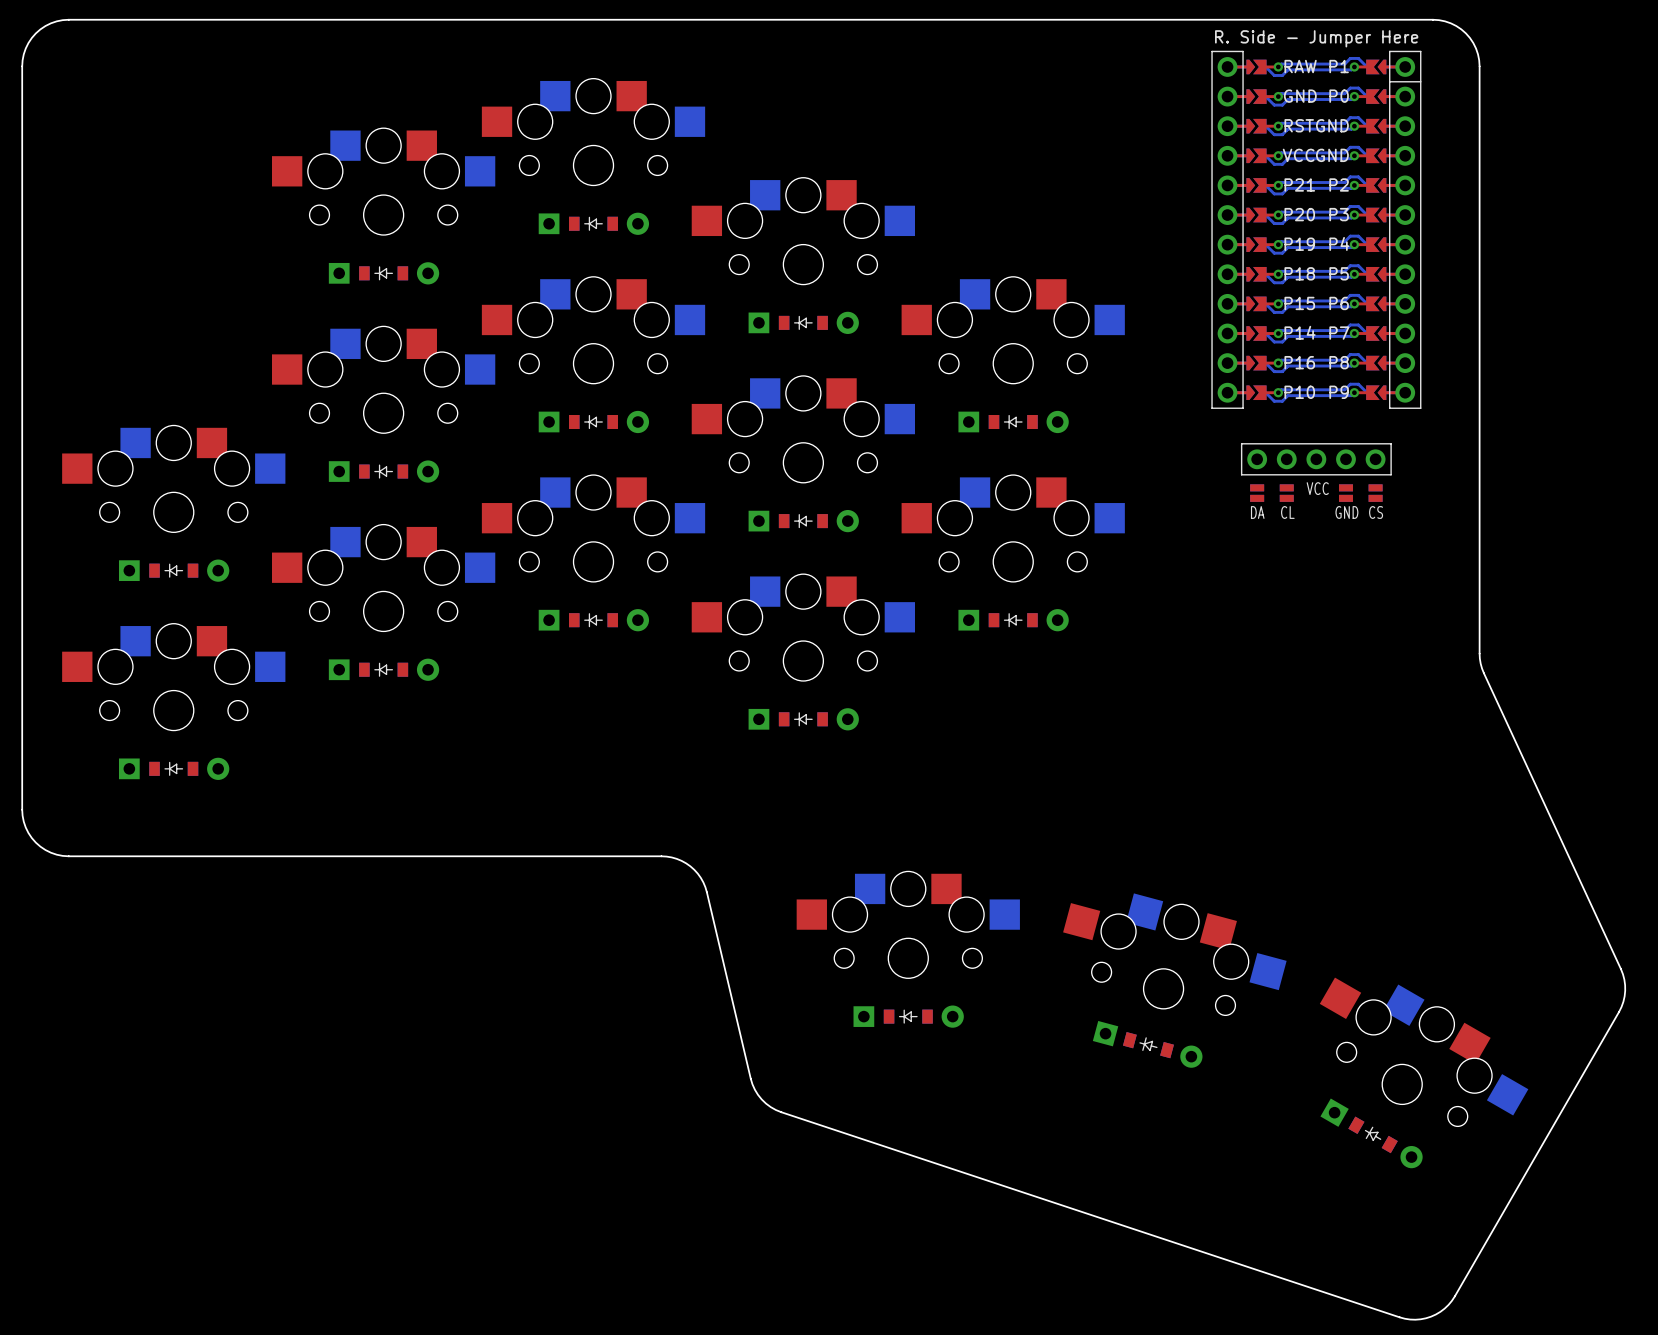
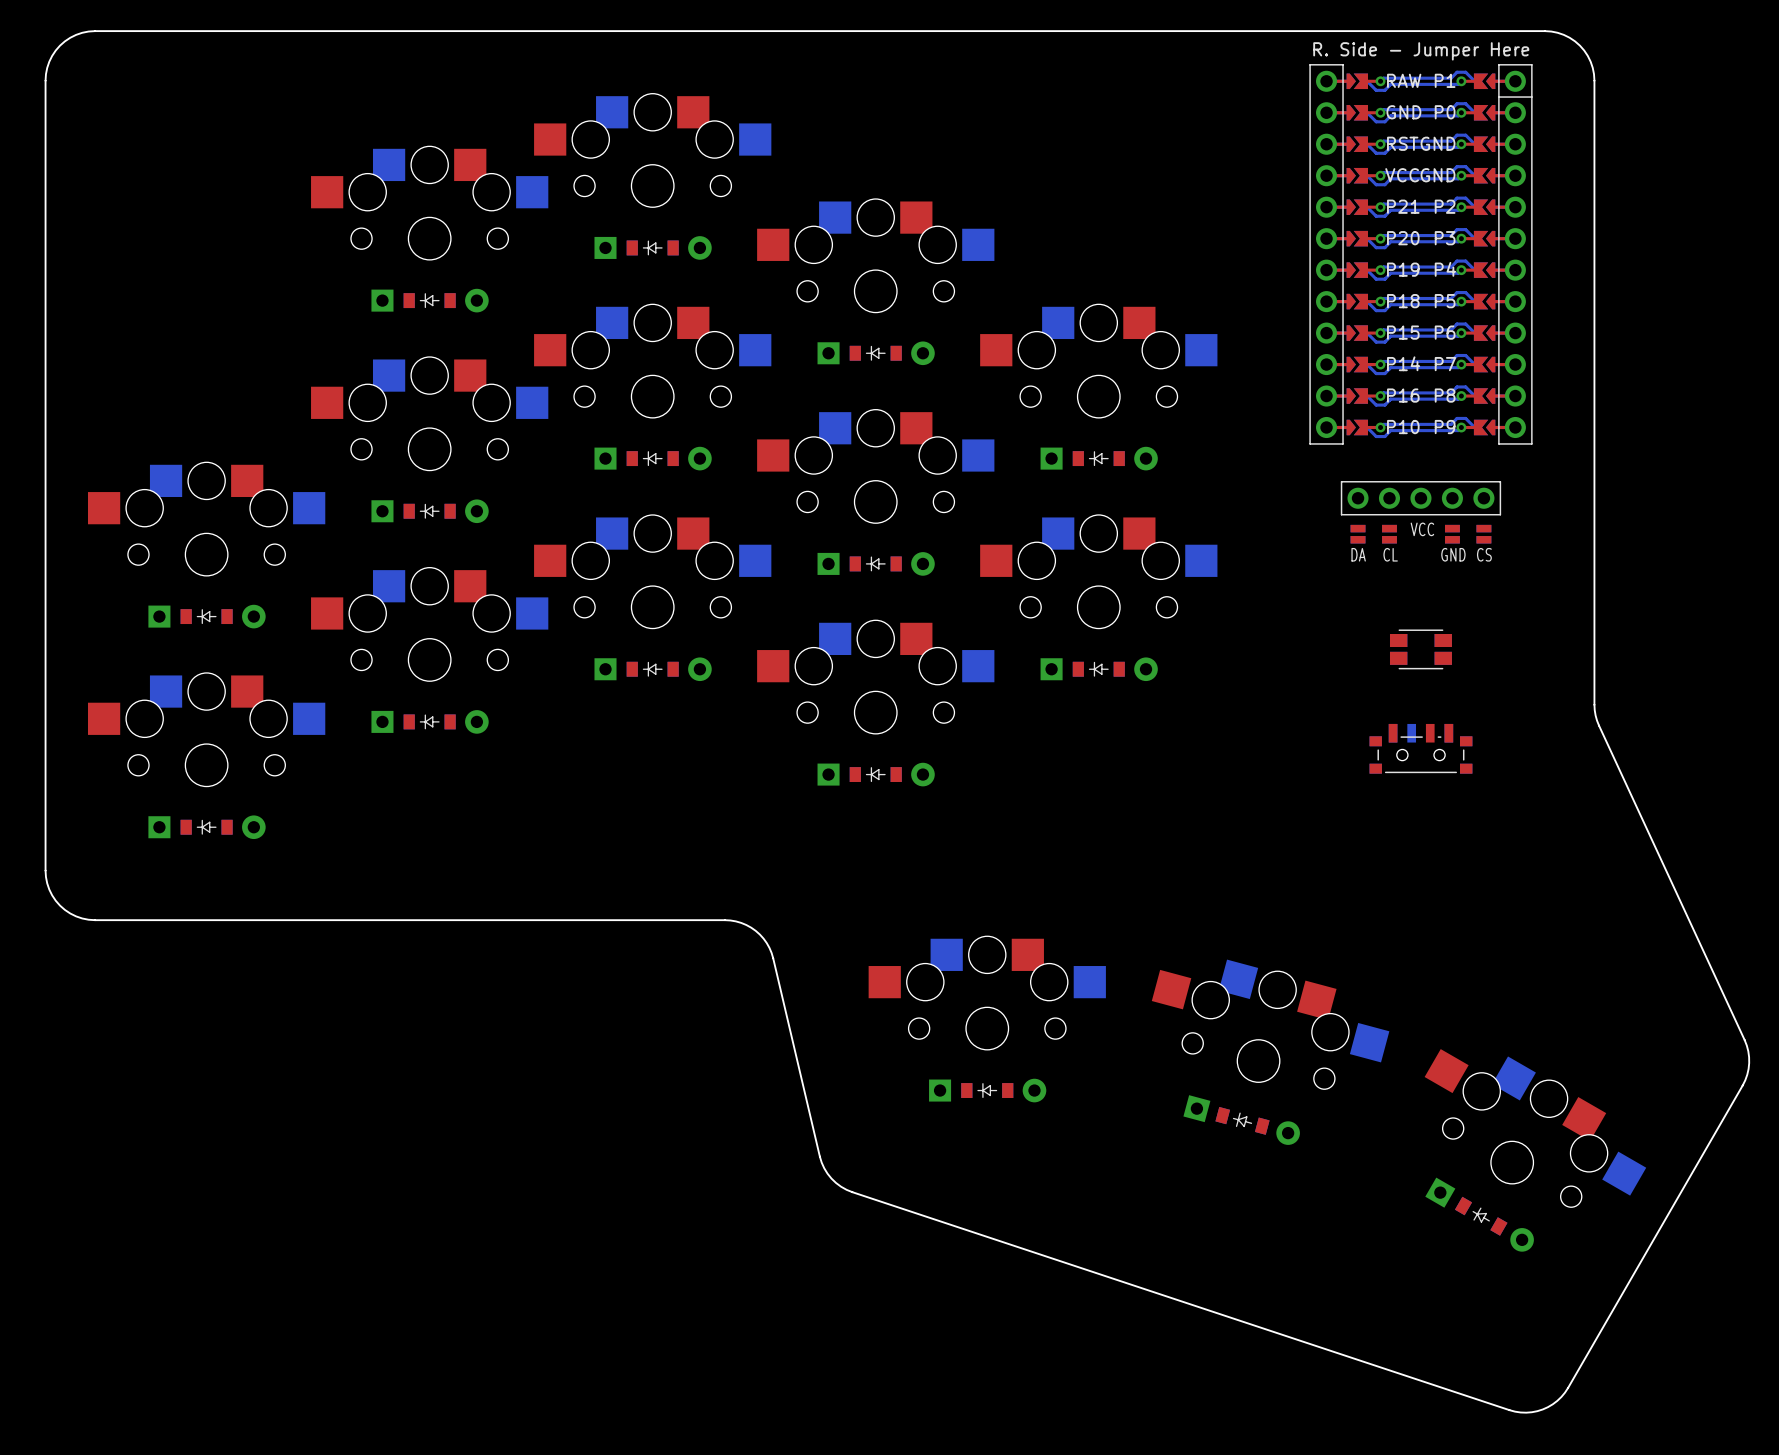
part: none -> (1420, 649)
part: none -> (1420, 748)

